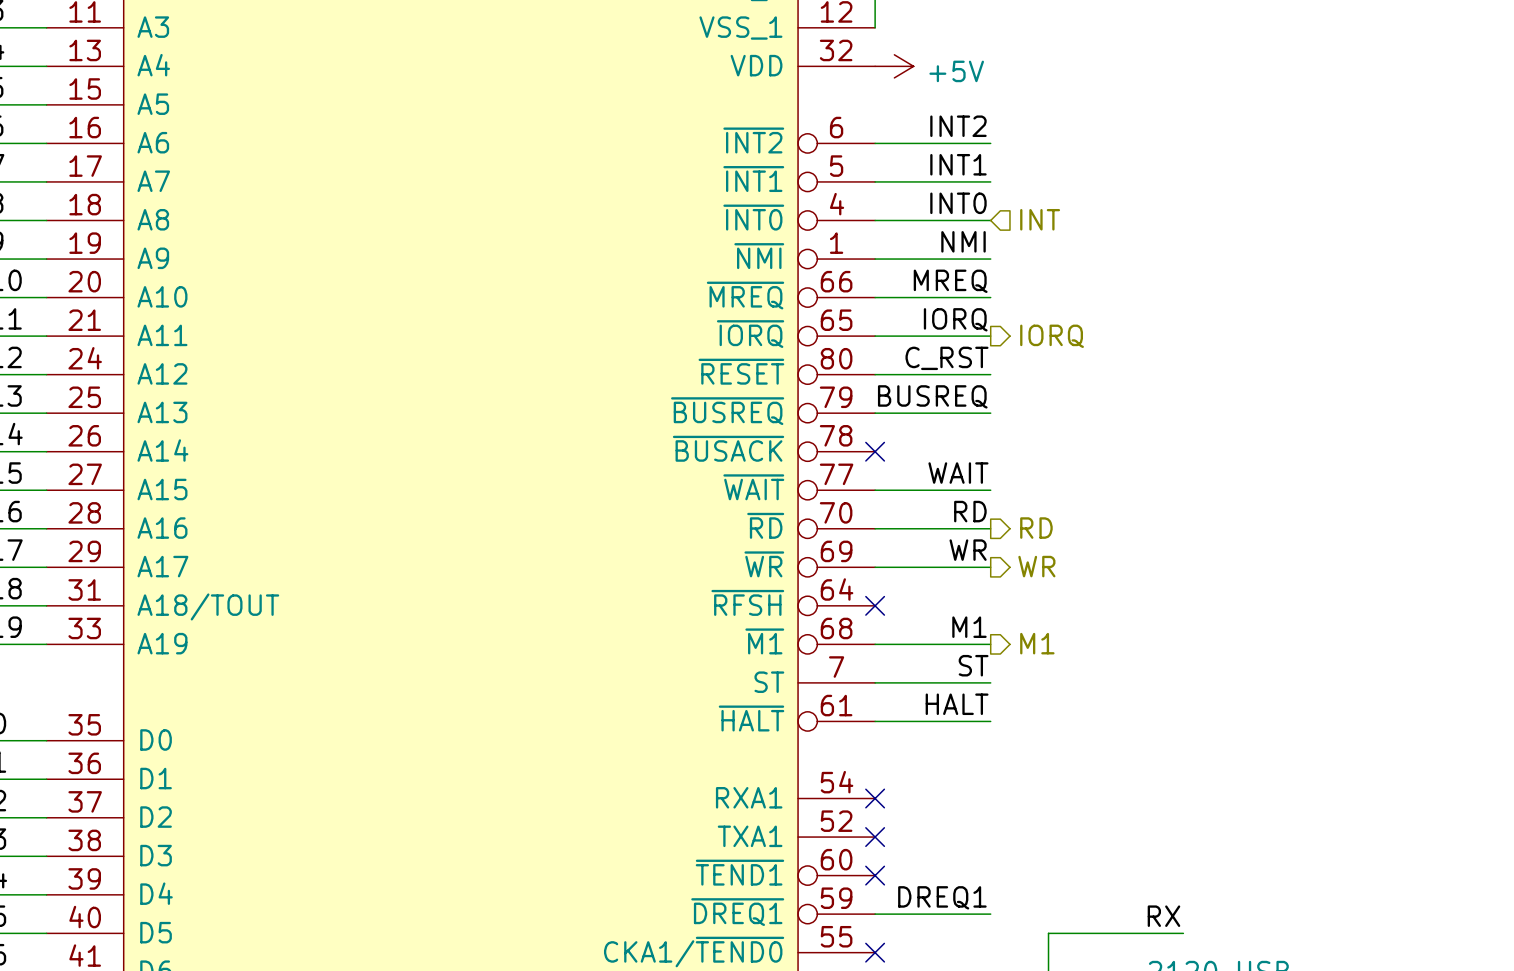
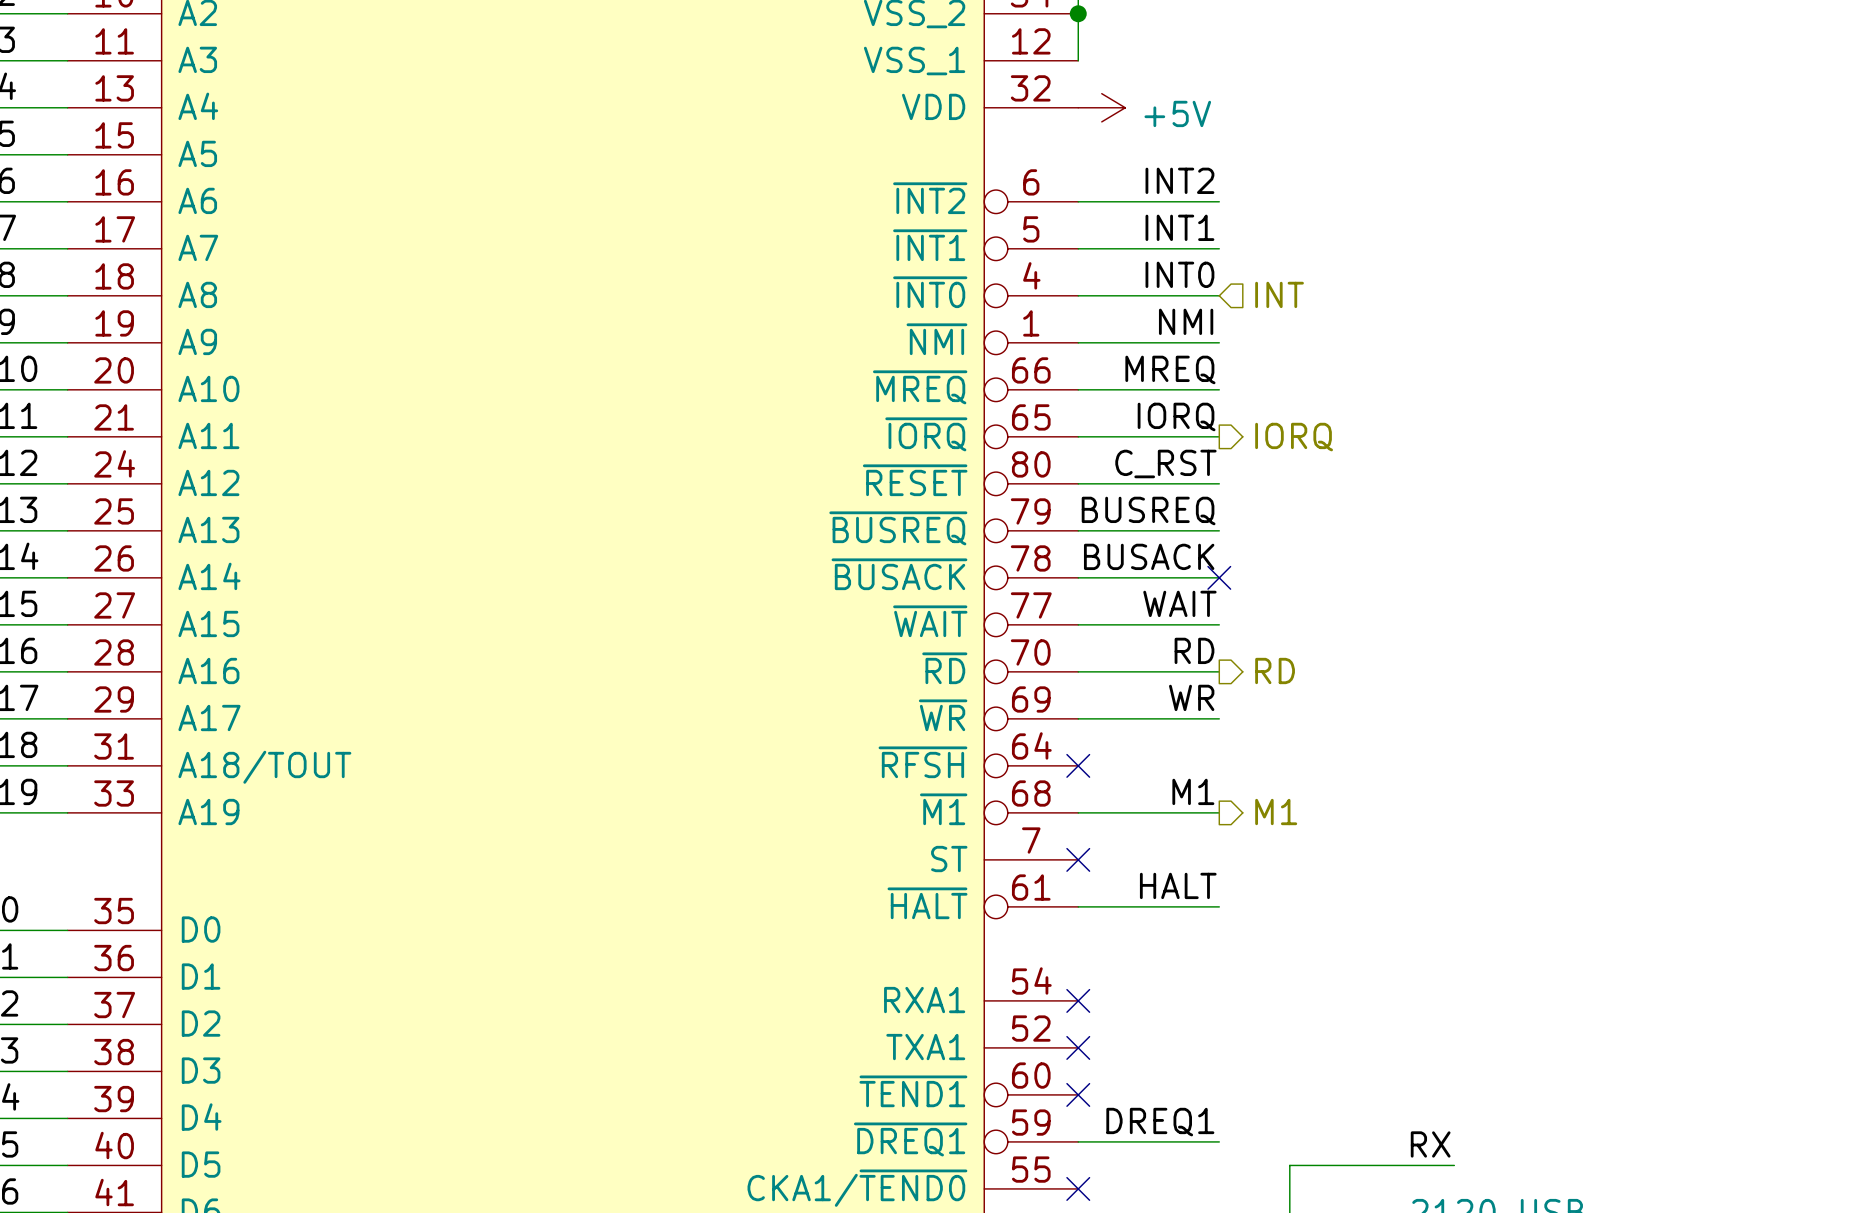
label: none -> BUSACK (1149, 556)
no-connect mark: (875, 451) -> none
no-connect mark: none -> (1219, 577)
hierarchical label: WR (1036, 566) -> none
label: ST (973, 665) -> none
wire: (875, 682) (990, 682) -> (1078, 577) (1219, 577)
no-connect mark: none -> (1078, 859)

